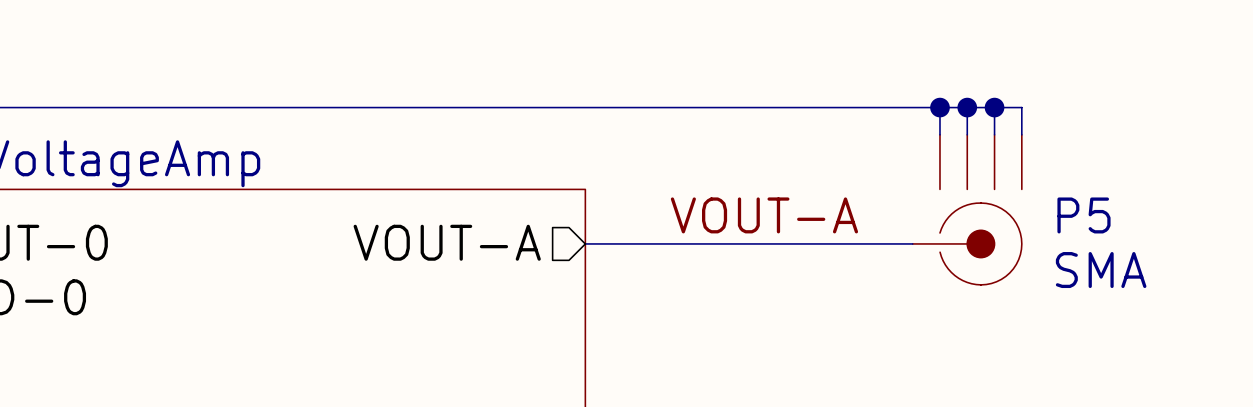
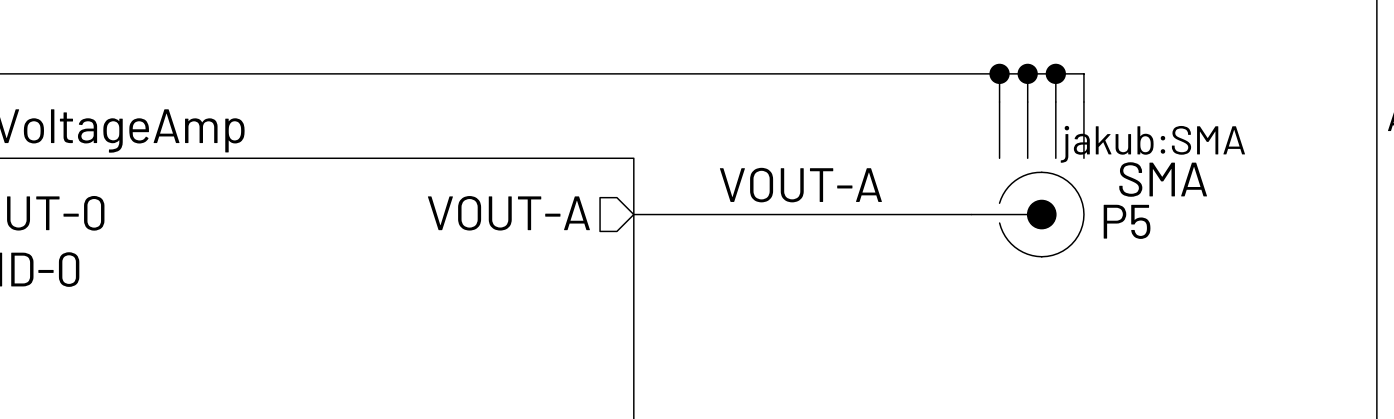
P5 text: none -> jakub:SMA (1152, 144)
P5 name position: P5 (1083, 215) -> P5 (1127, 221)
P5 value position: SMA (1101, 270) -> SMA (1163, 179)

